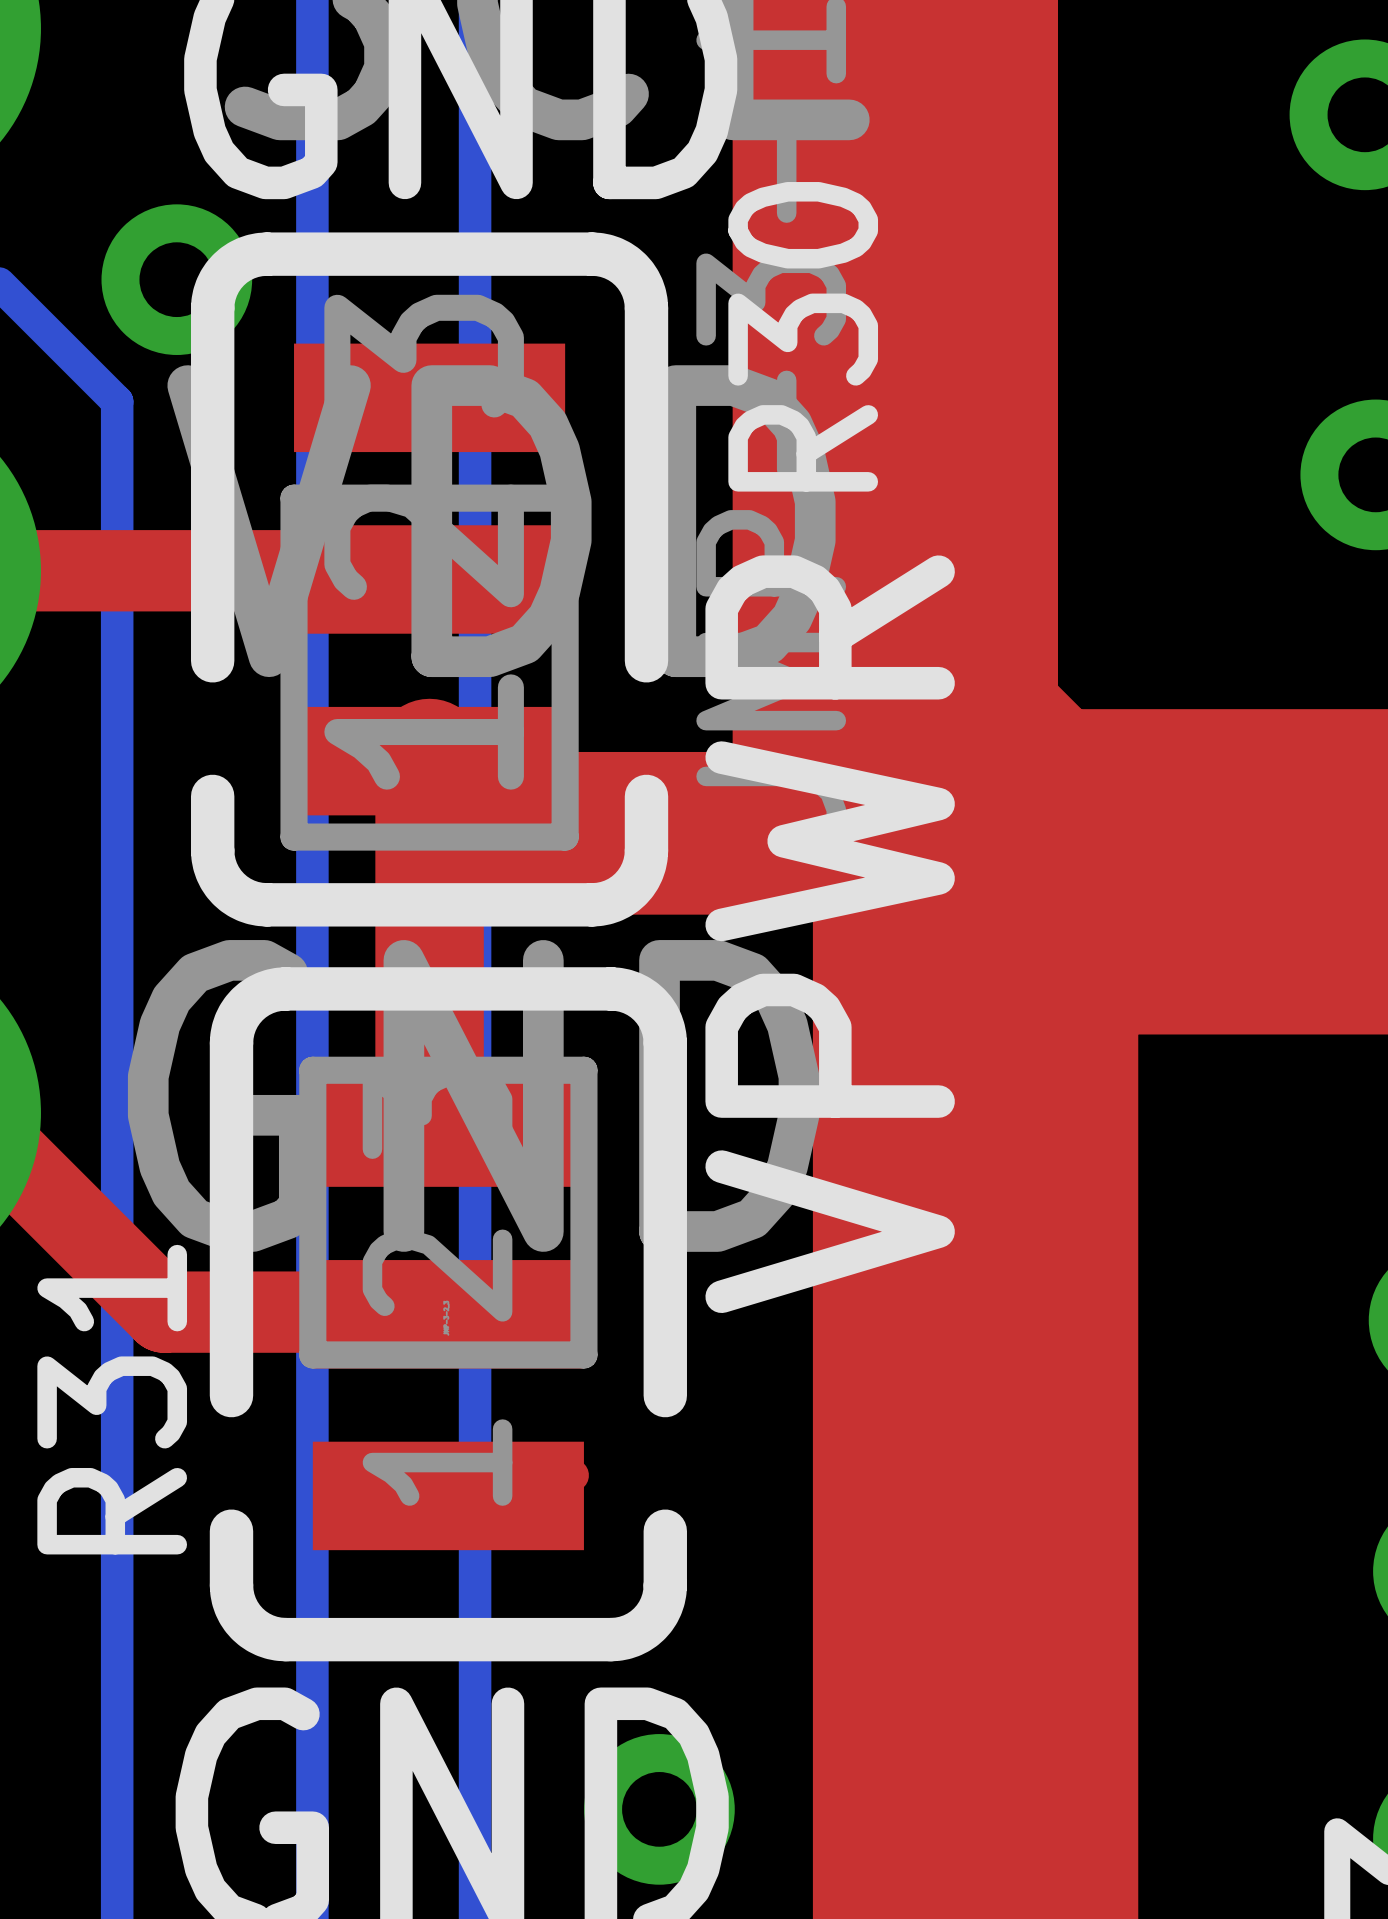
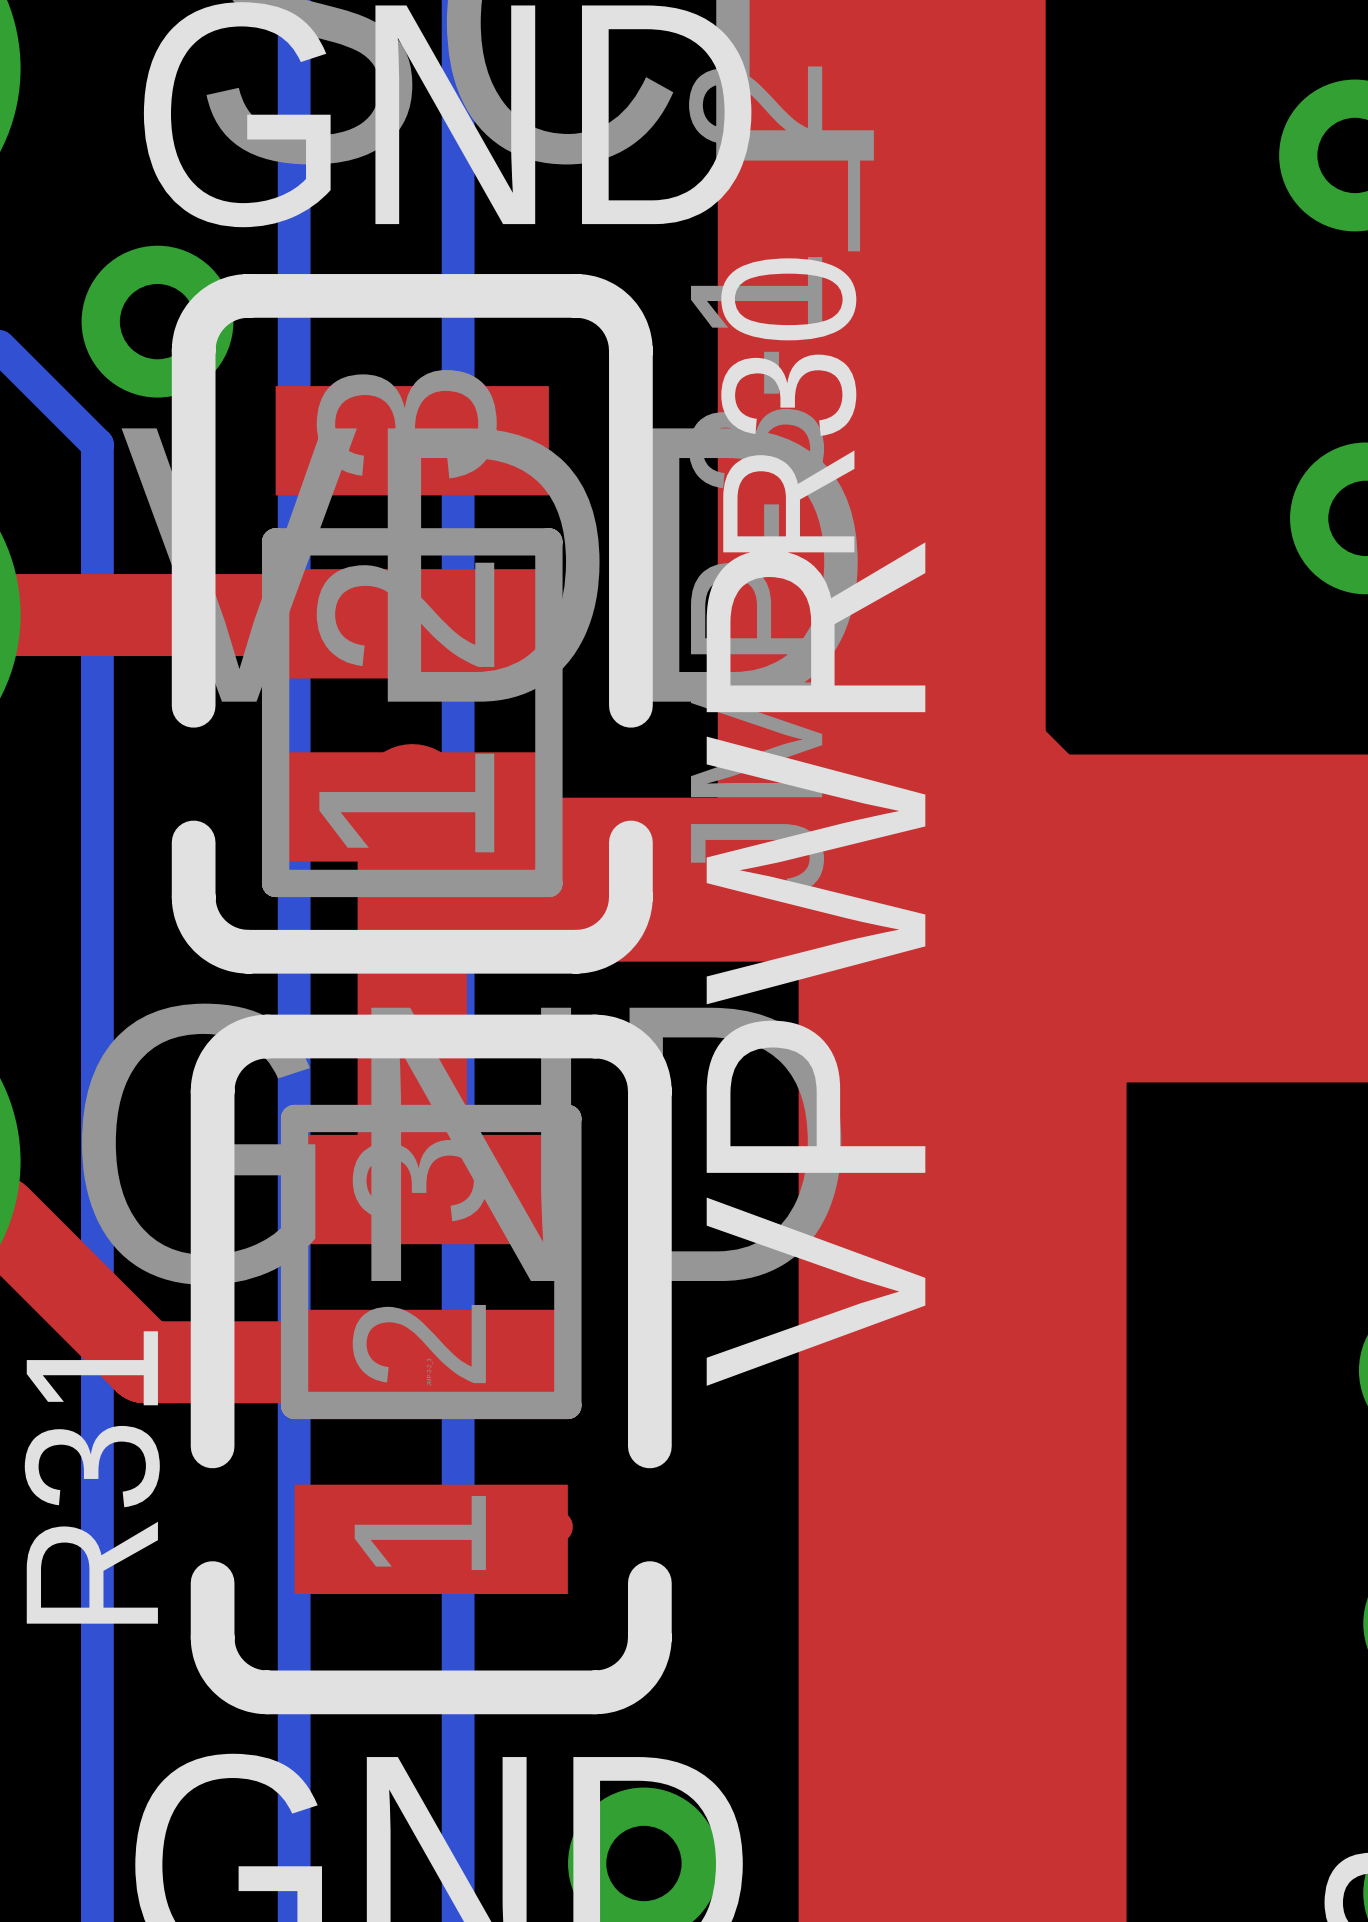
R31 footprint: [209, 967, 687, 1662] -> [190, 1014, 672, 1715]

